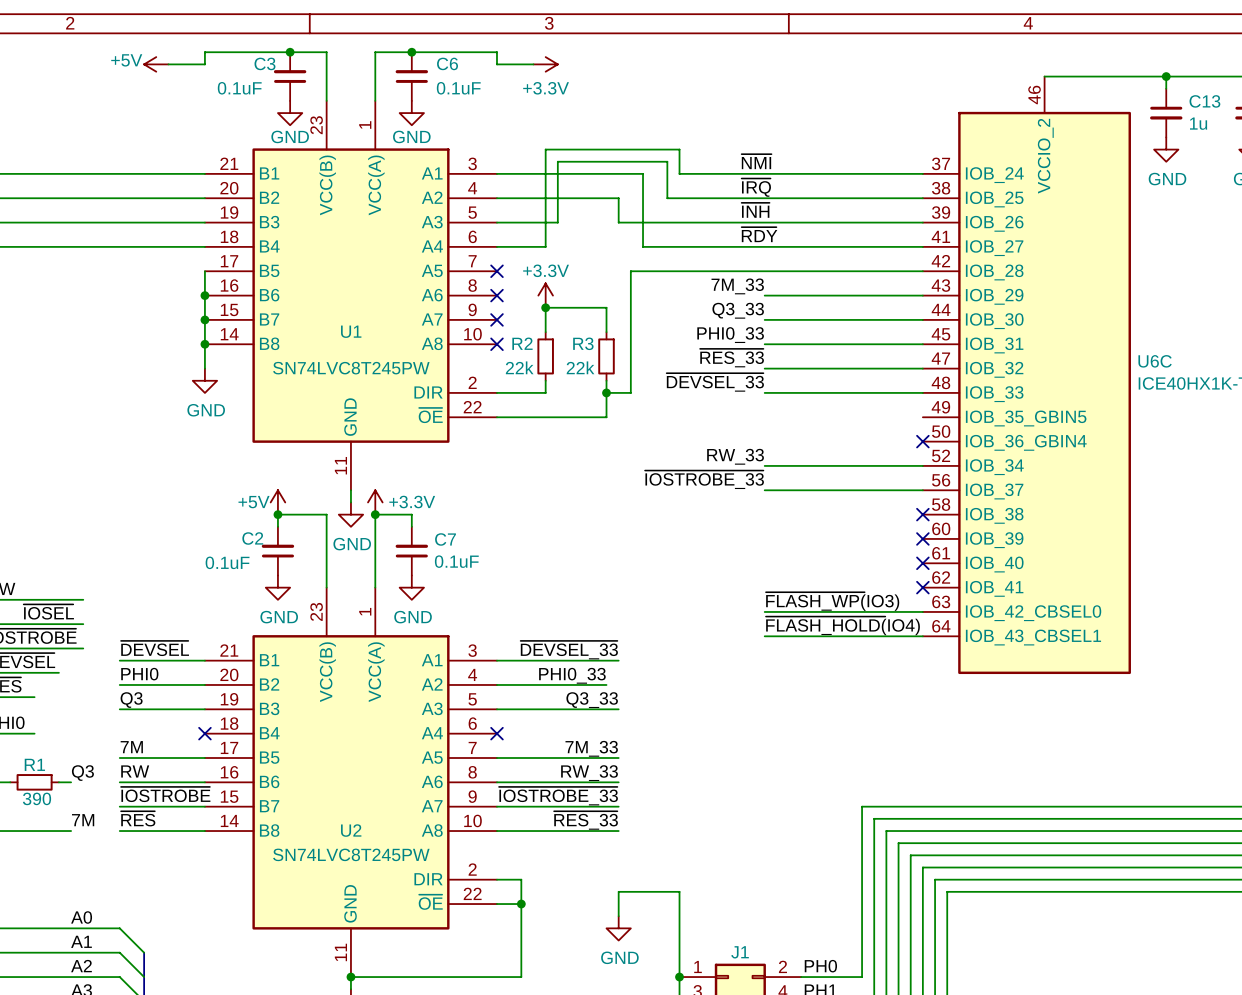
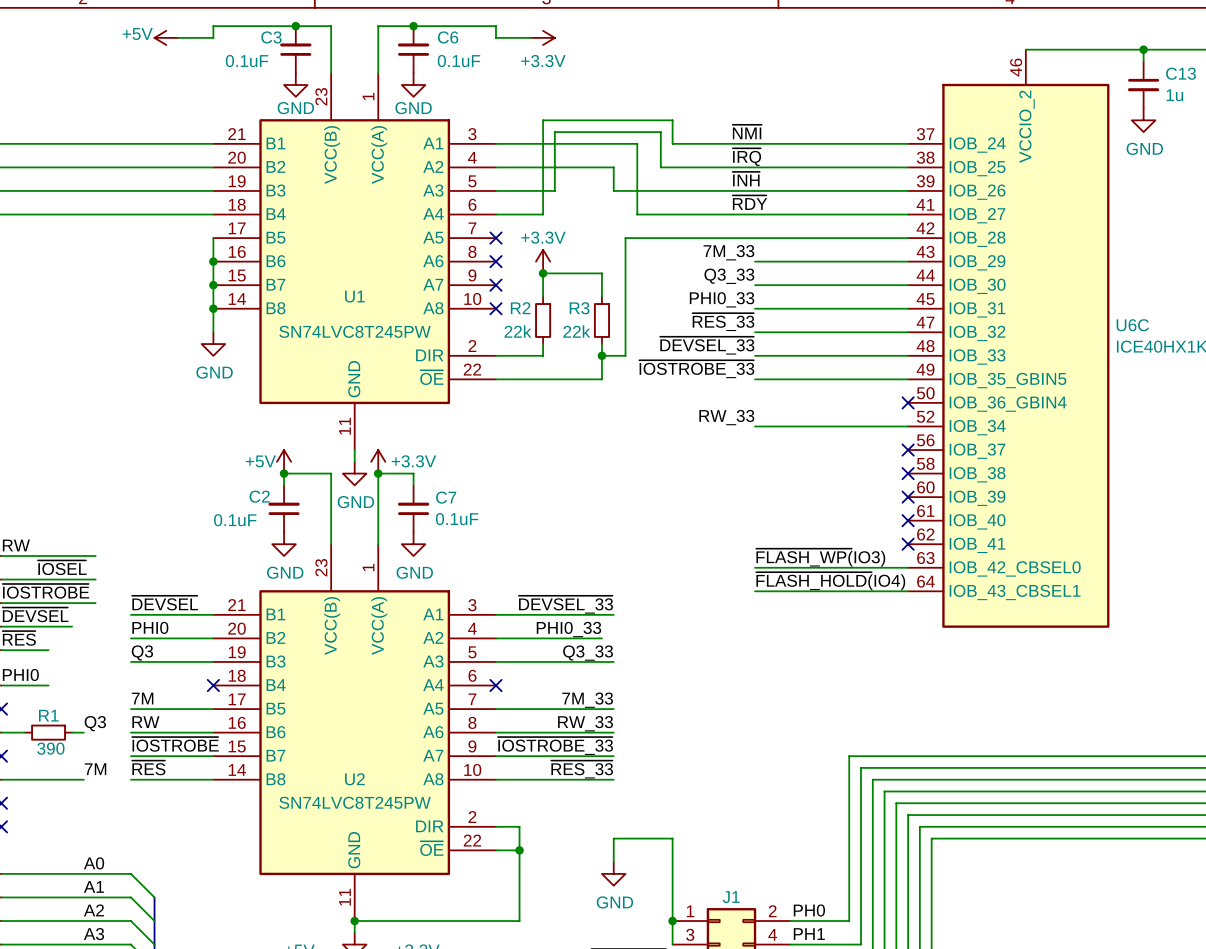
label position: ~{IOSTROBE_33} (704, 479) -> ~{IOSTROBE_33} (696, 369)
wire: (764, 490) (922, 490) -> (755, 379) (908, 379)
no-connect mark: none -> (908, 450)

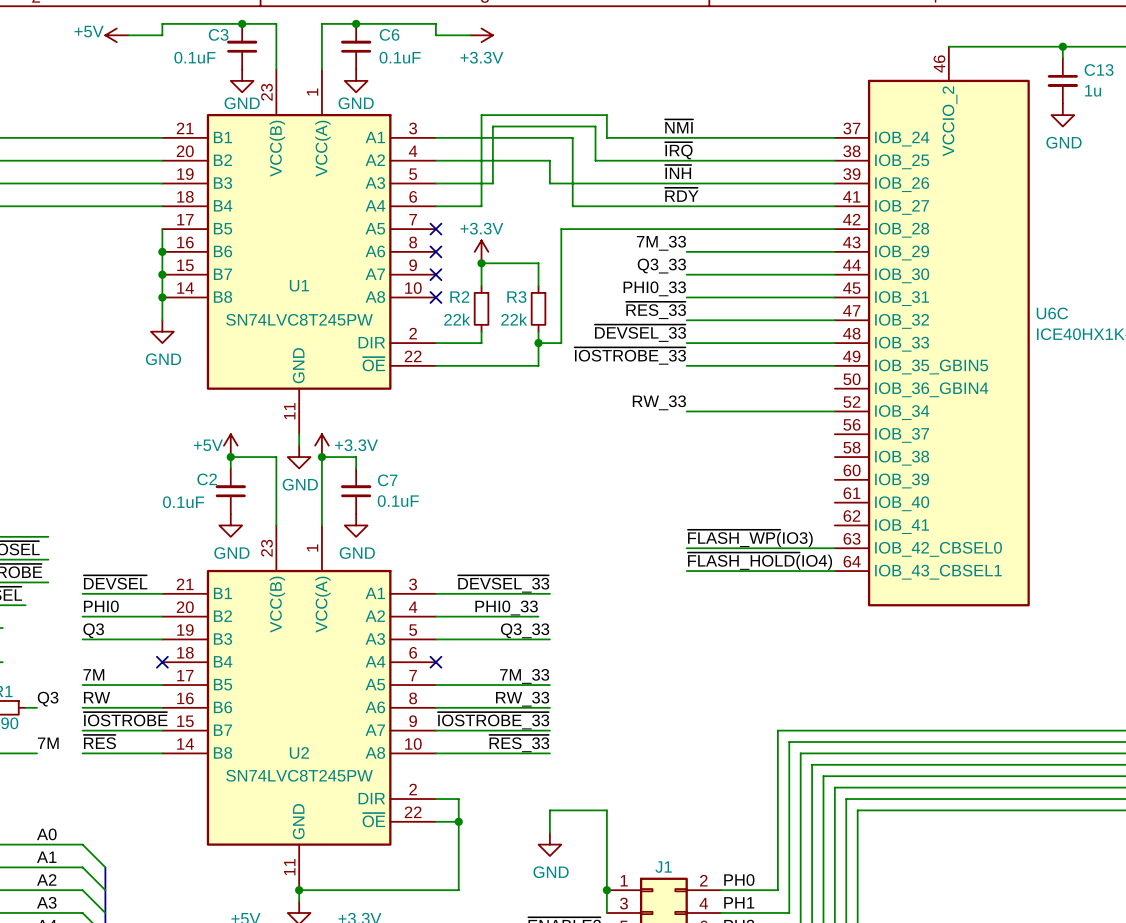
no-connect mark: (908, 402) -> none
no-connect mark: (908, 450) -> none
no-connect mark: (908, 473) -> none
no-connect mark: (908, 497) -> none
no-connect mark: (908, 520) -> none
no-connect mark: (908, 544) -> none

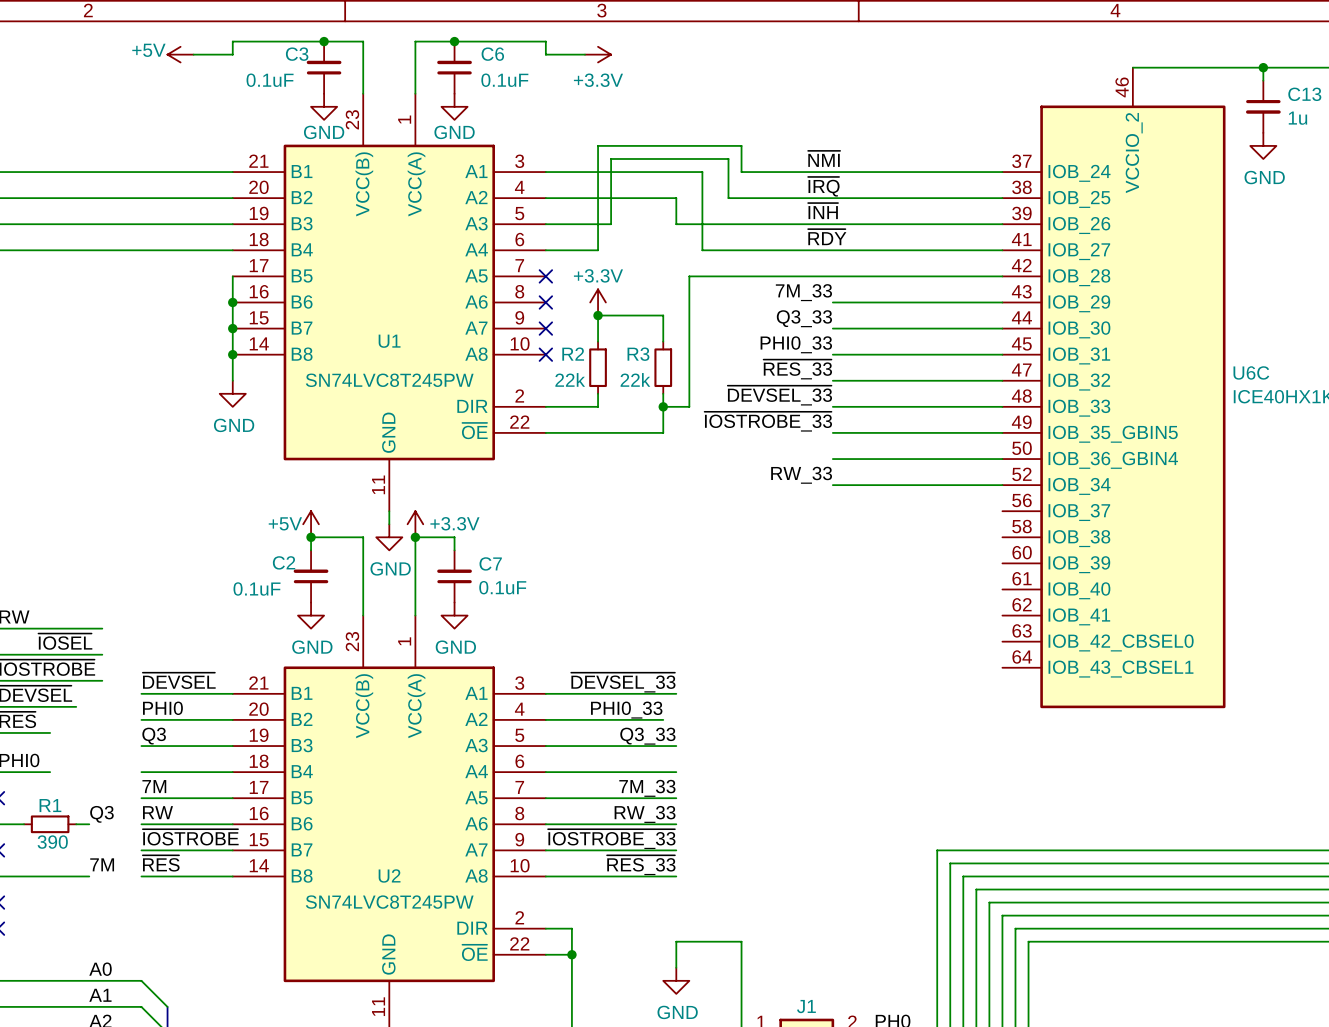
label: ~{FLASH_WP(}IO3) (750, 538) -> none
wire: (686, 548) (834, 548) -> (832, 459) (1002, 459)
label: ~{FLASH_HOLD(}IO4) (759, 561) -> none
wire: (686, 571) (834, 571) -> none
wire: none -> (141, 772) (232, 772)
no-connect mark: (162, 662) -> none
wire: none -> (545, 772) (676, 772)
no-connect mark: (435, 662) -> none

